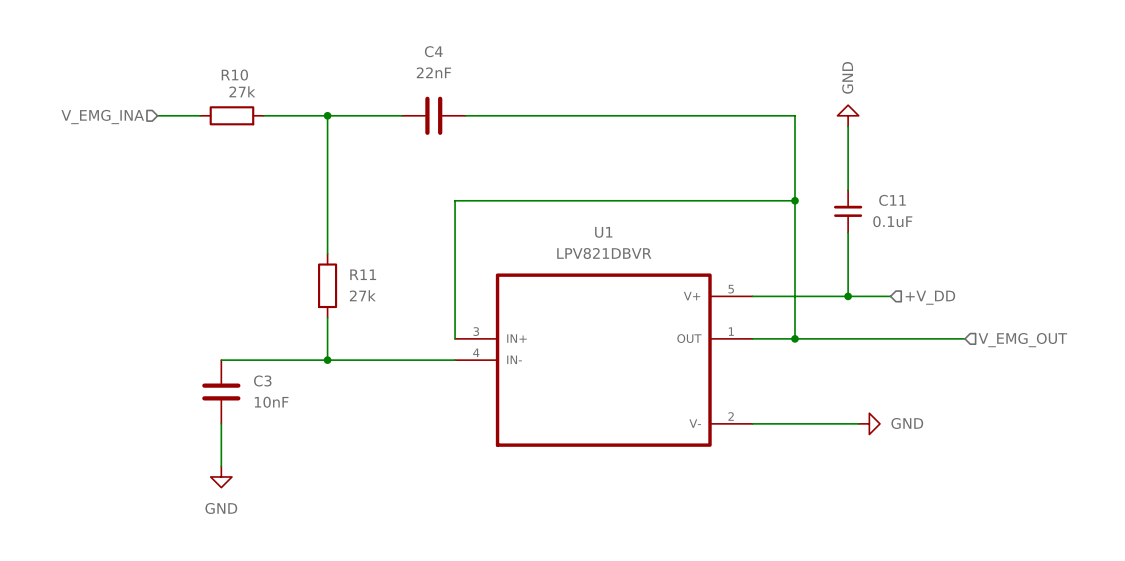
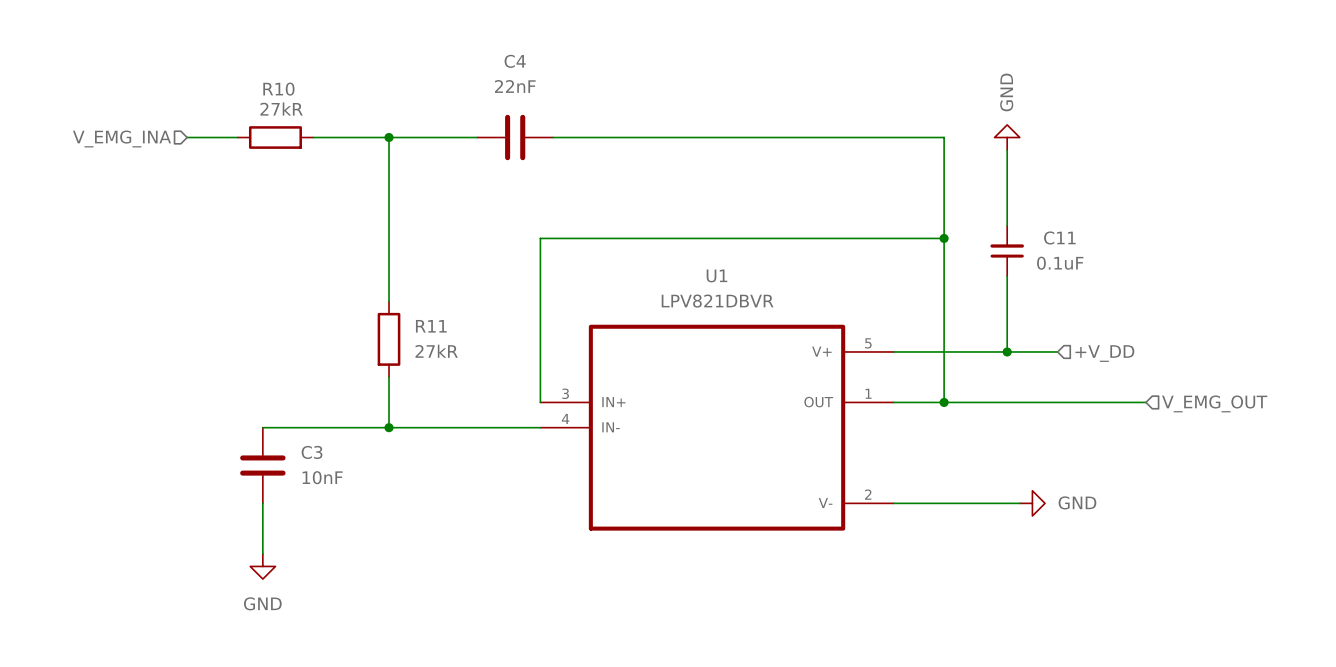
R10 value: 27k (242, 91) -> 27kR (281, 109)
R11 value: 27k (362, 295) -> 27kR (436, 351)

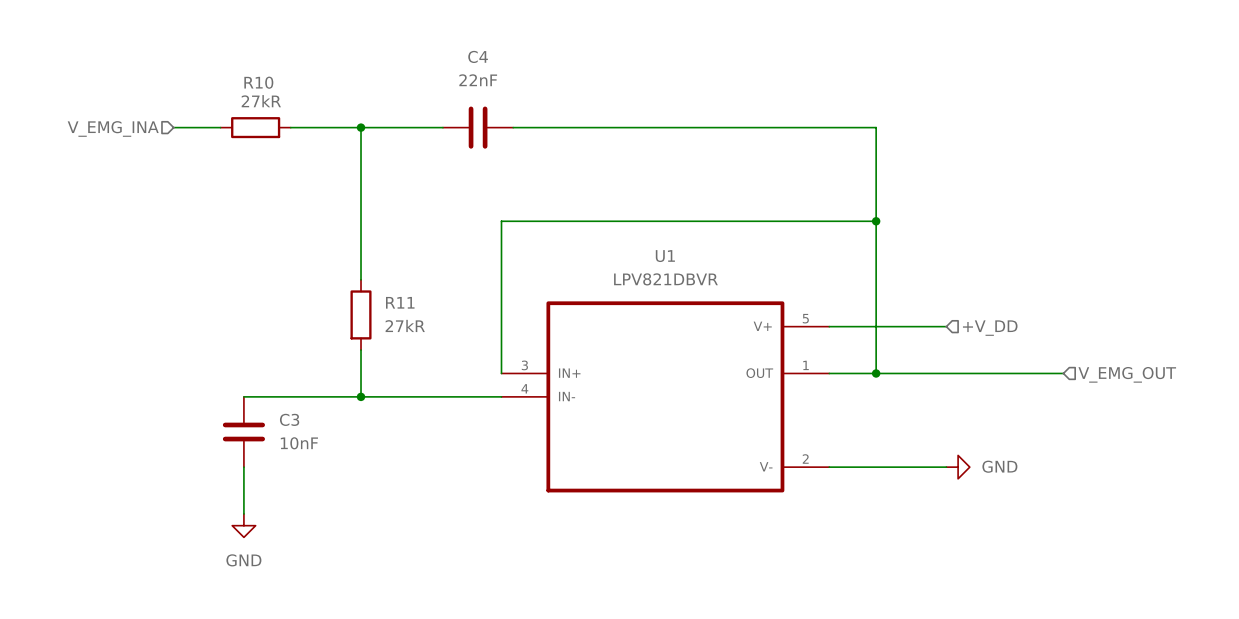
power symbol: GND (1007, 137) -> none
wire: (1007, 150) (1007, 225) -> none
C11: 0.1uF (1007, 251) -> none
wire: (1007, 276) (1007, 351) -> none
junction: (1007, 351) -> none
wire: (1019, 351) (1057, 351) -> none
hierarchical label position: +V_DD (1104, 353) -> +V_DD (990, 328)

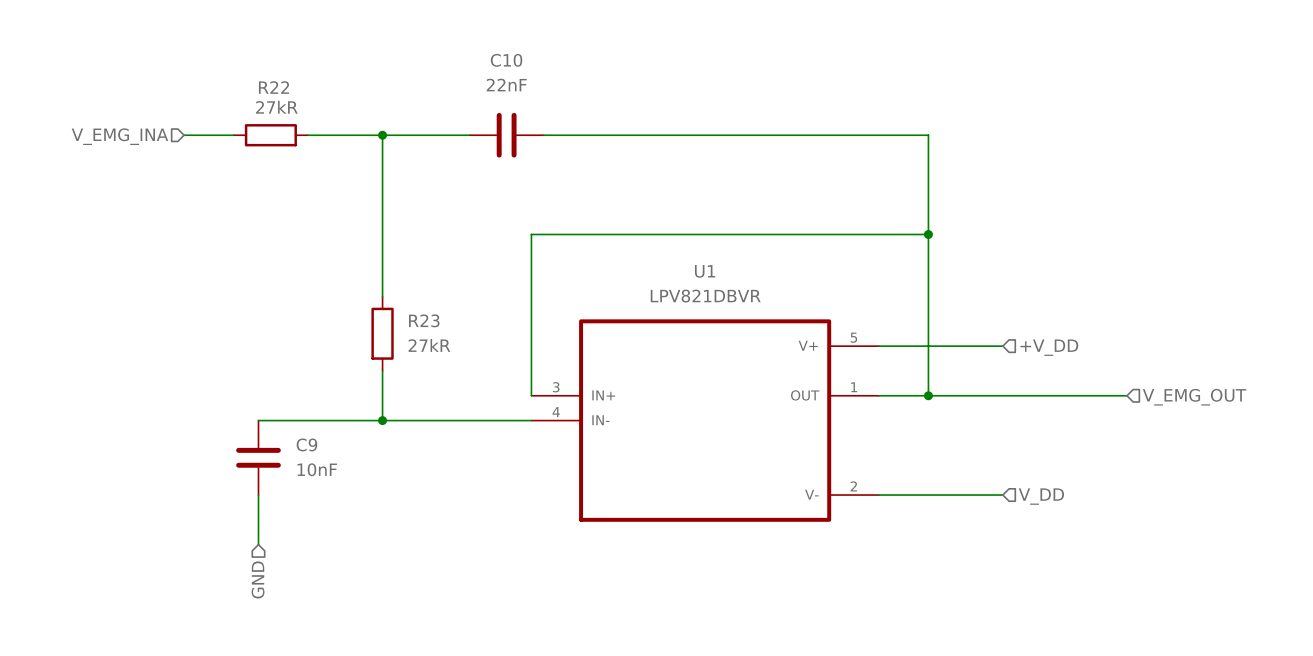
C4 name: C4 (478, 56) -> C10 (506, 60)
R10 name: R10 (258, 82) -> R22 (273, 87)
R11 name: R11 (400, 302) -> R23 (424, 320)
C3 name: C3 (289, 419) -> C9 (306, 444)
power symbol: GND (958, 467) -> none
hierarchical label: none -> V_DD (1041, 496)
power symbol: GND (243, 525) -> none
hierarchical label: none -> GND (258, 579)

